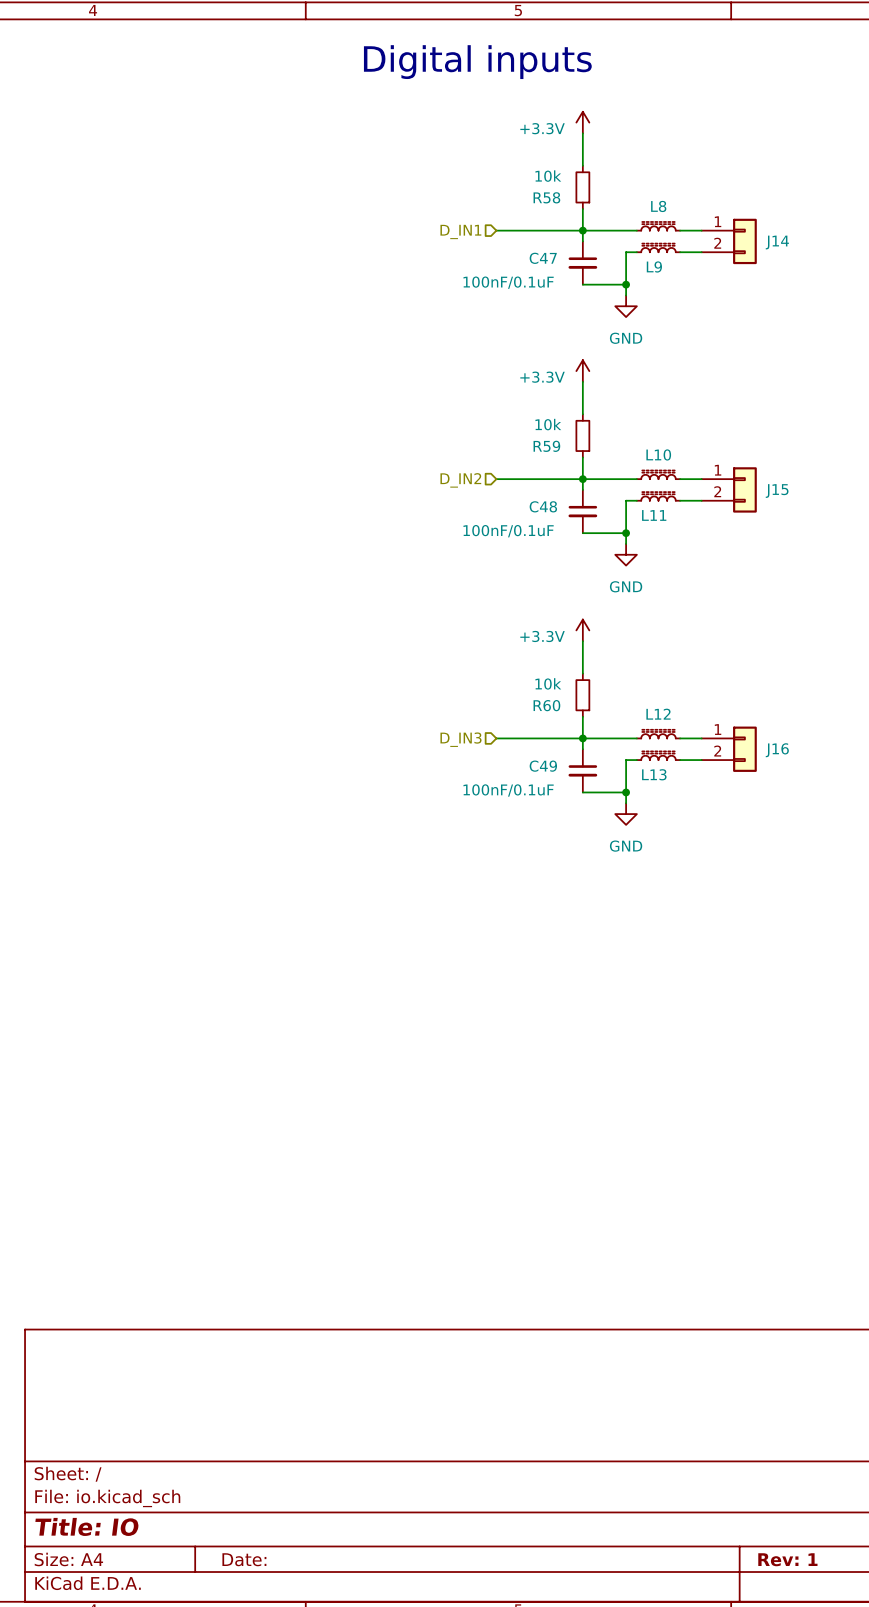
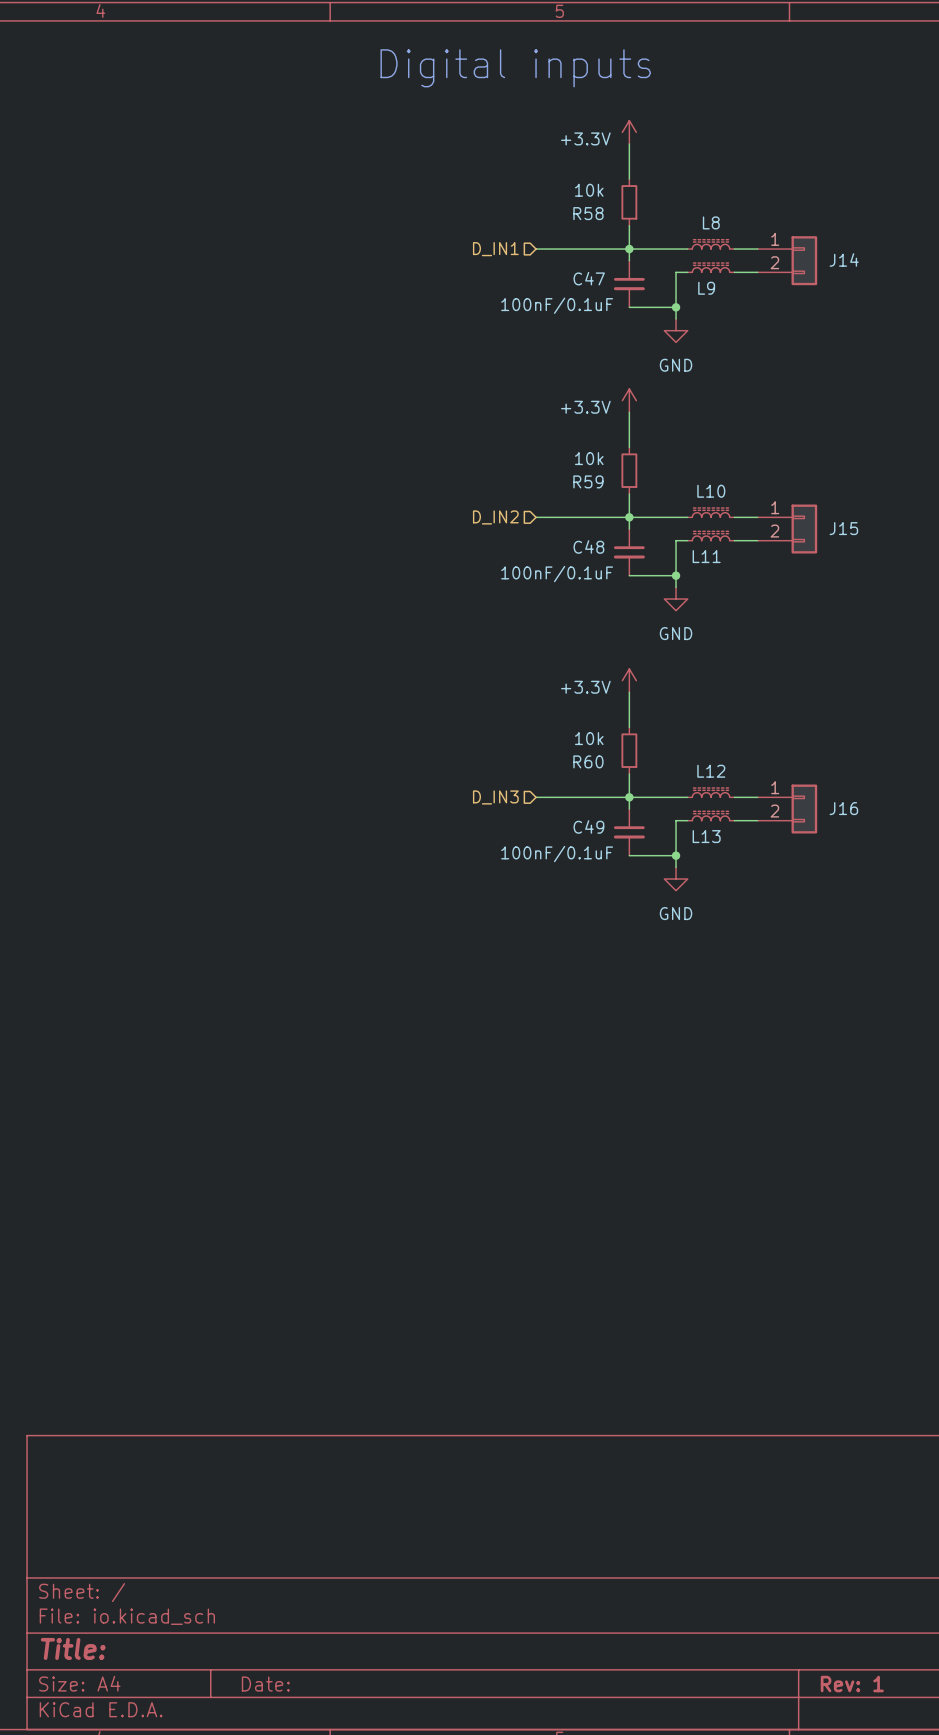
title block: Title: IO (87, 1526) -> Title: (73, 1648)

